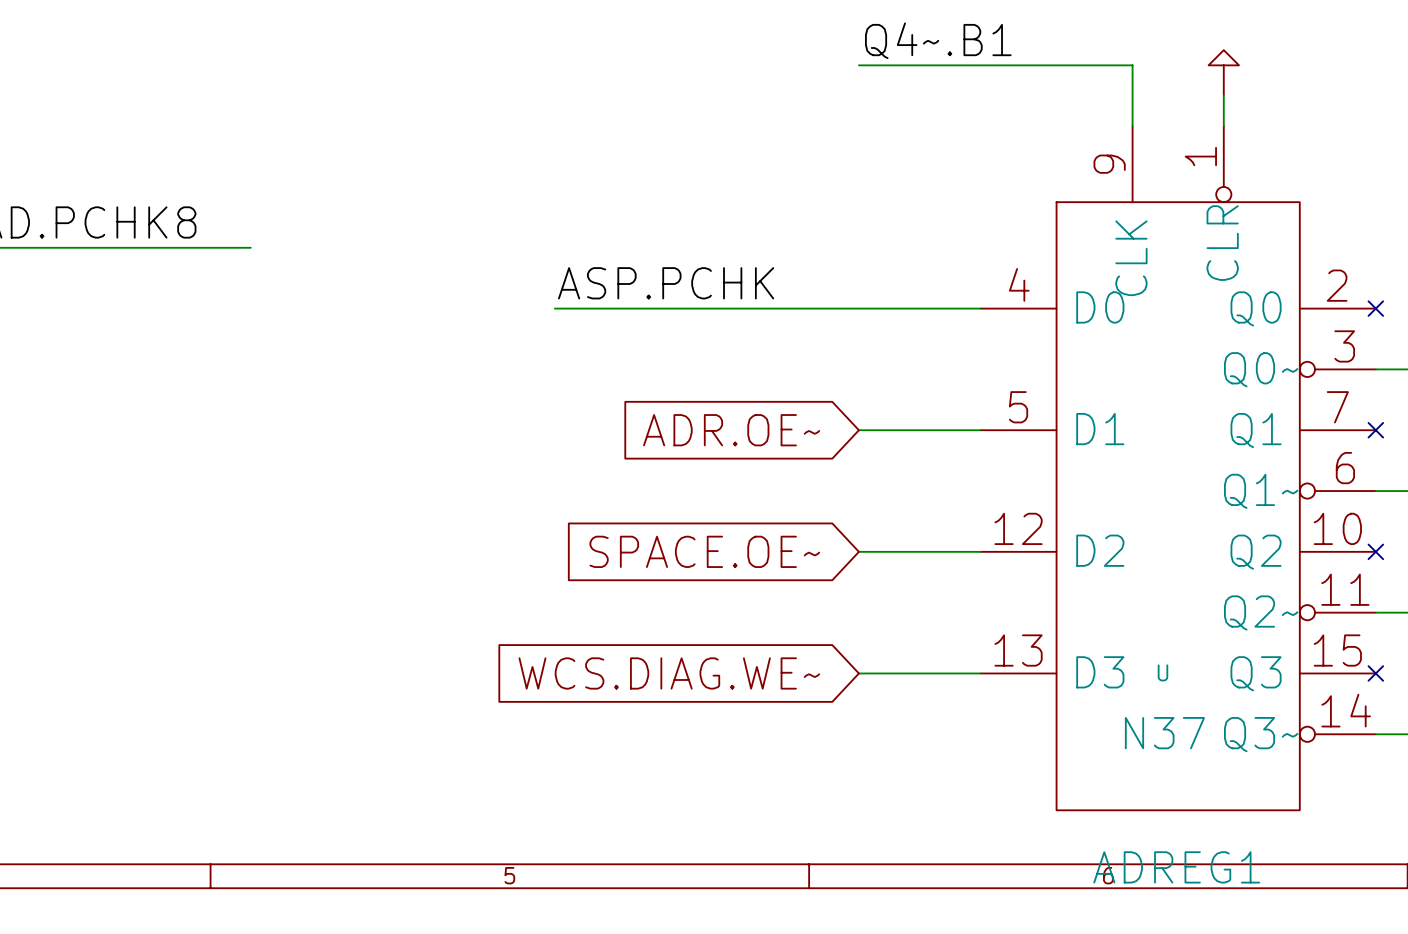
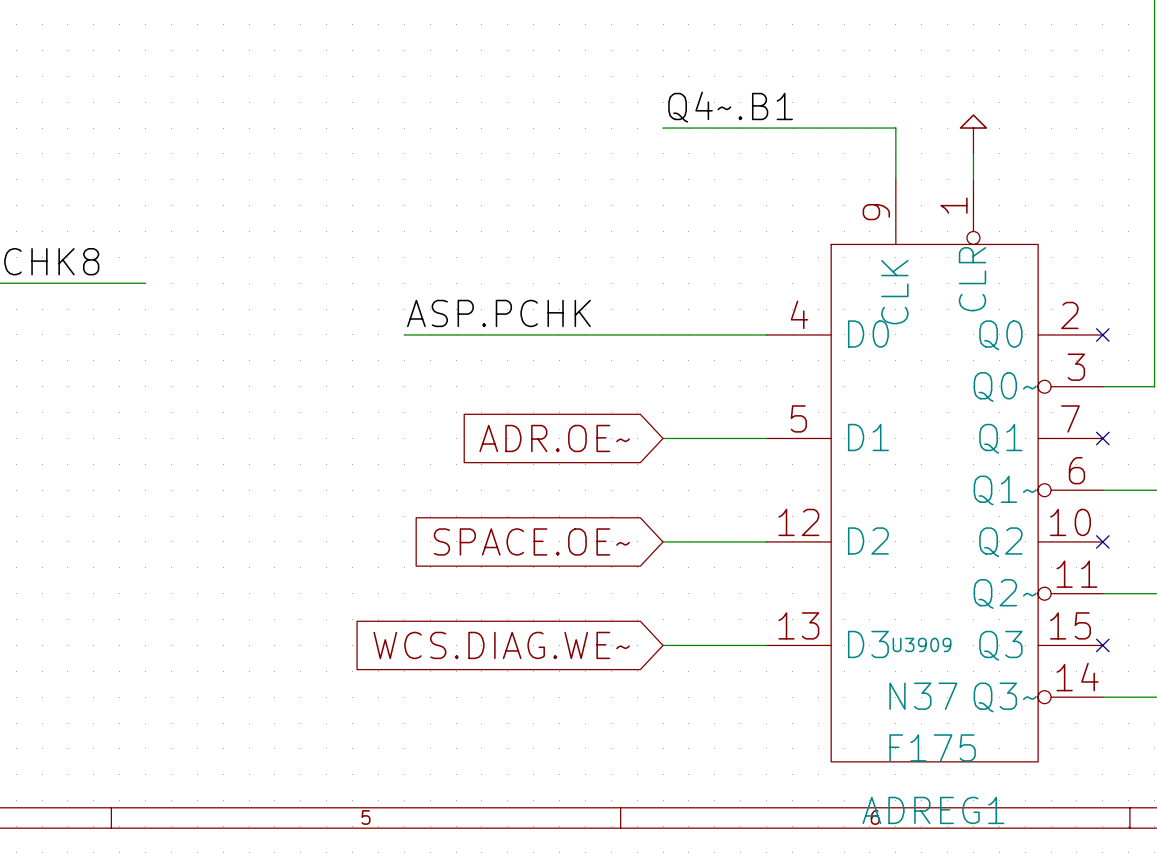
U name: U (1162, 672) -> U3909 (922, 644)
U value: none -> F175 (932, 747)

